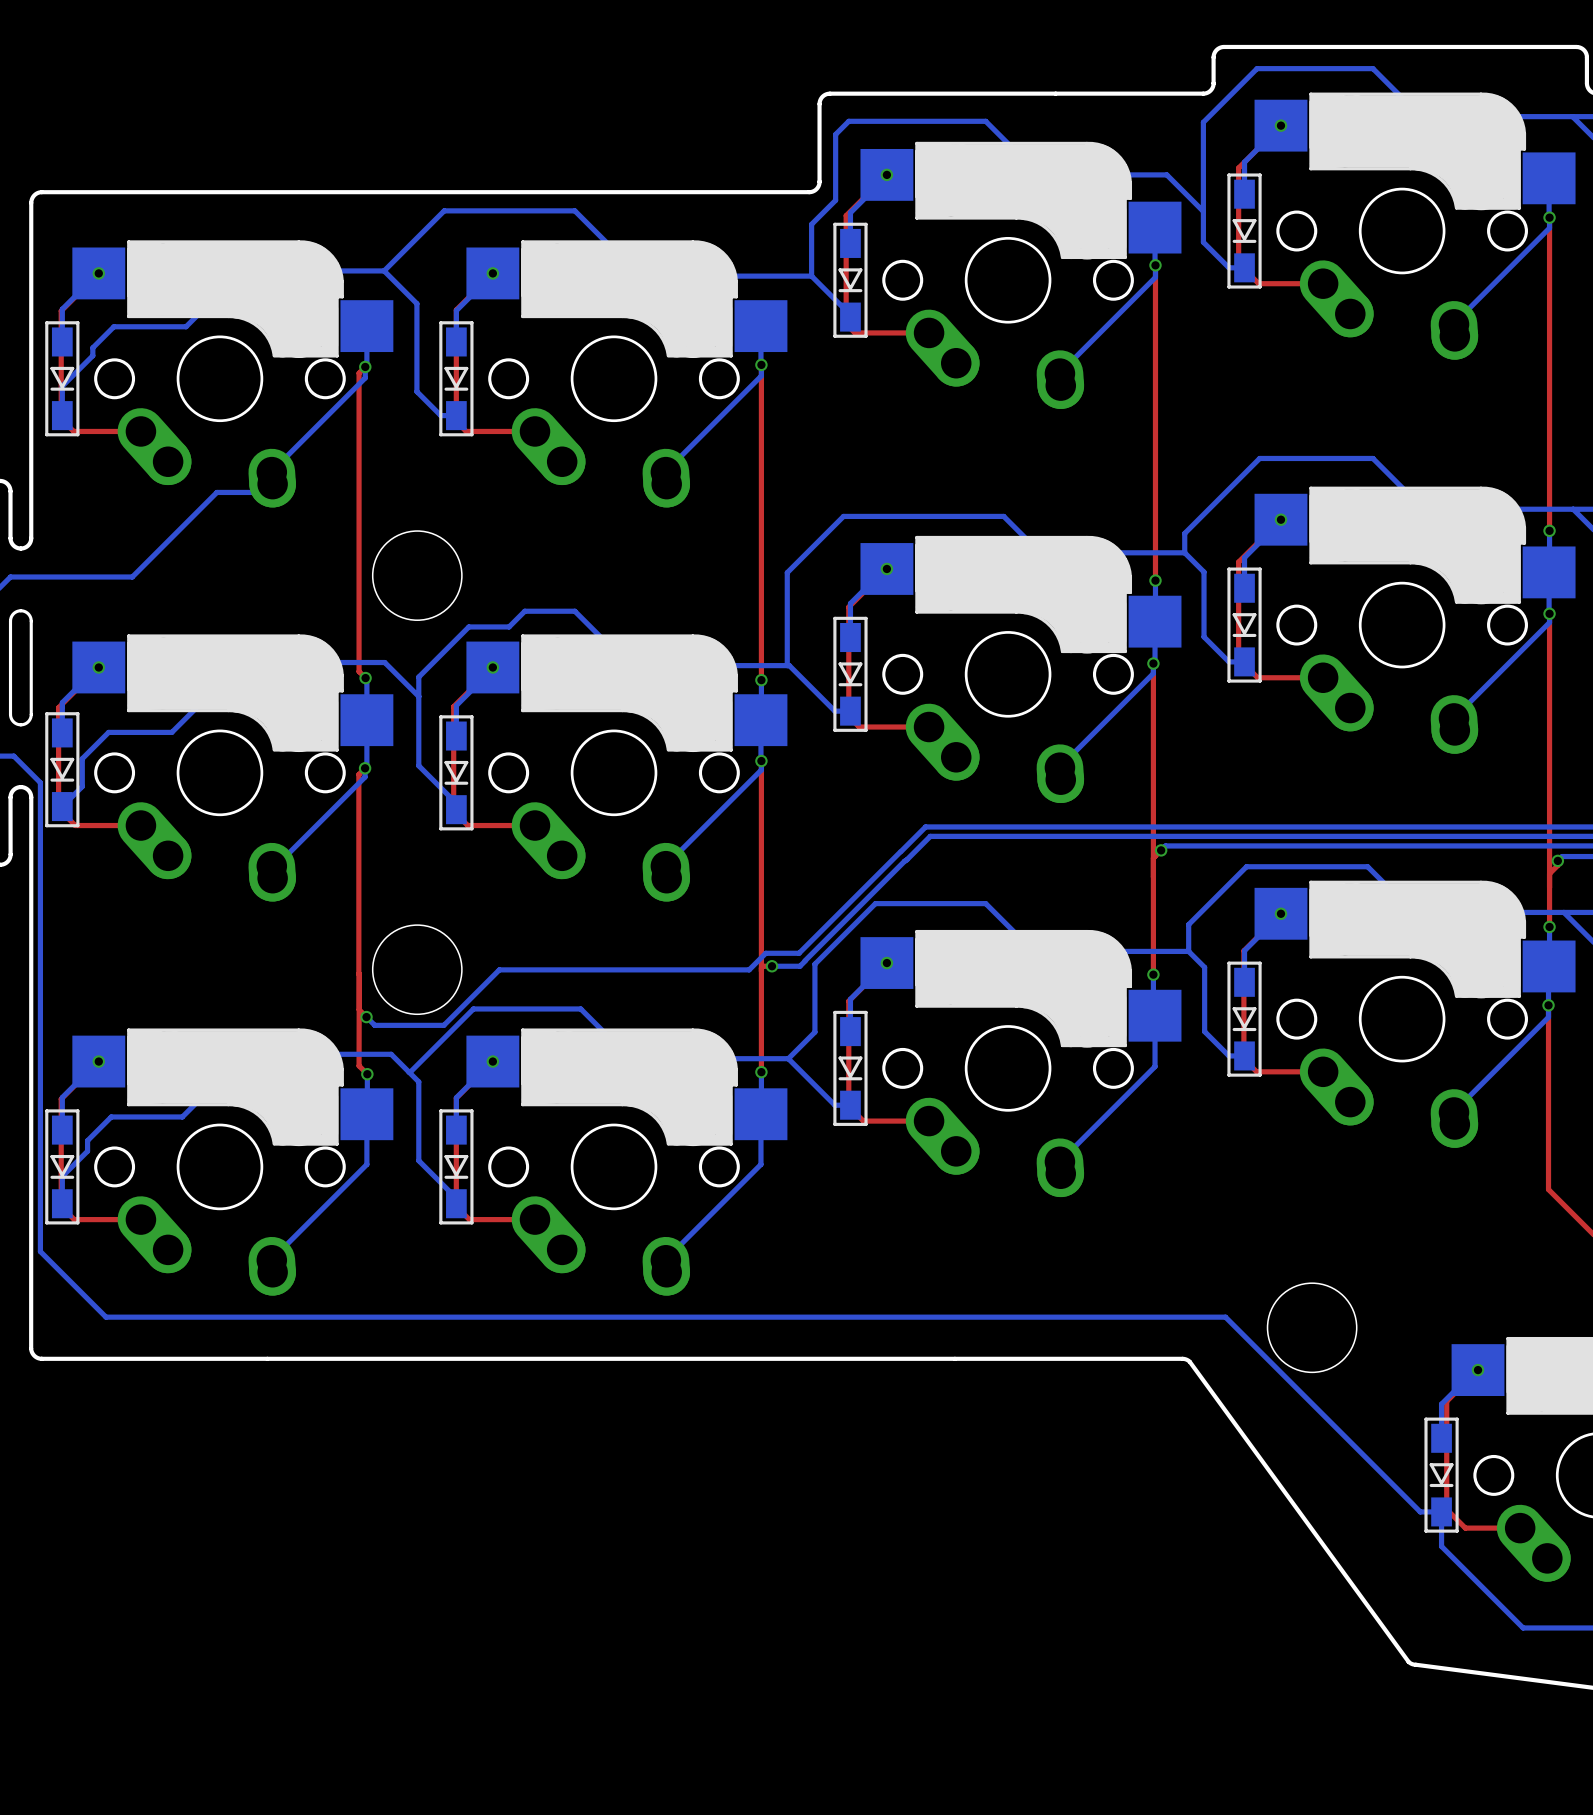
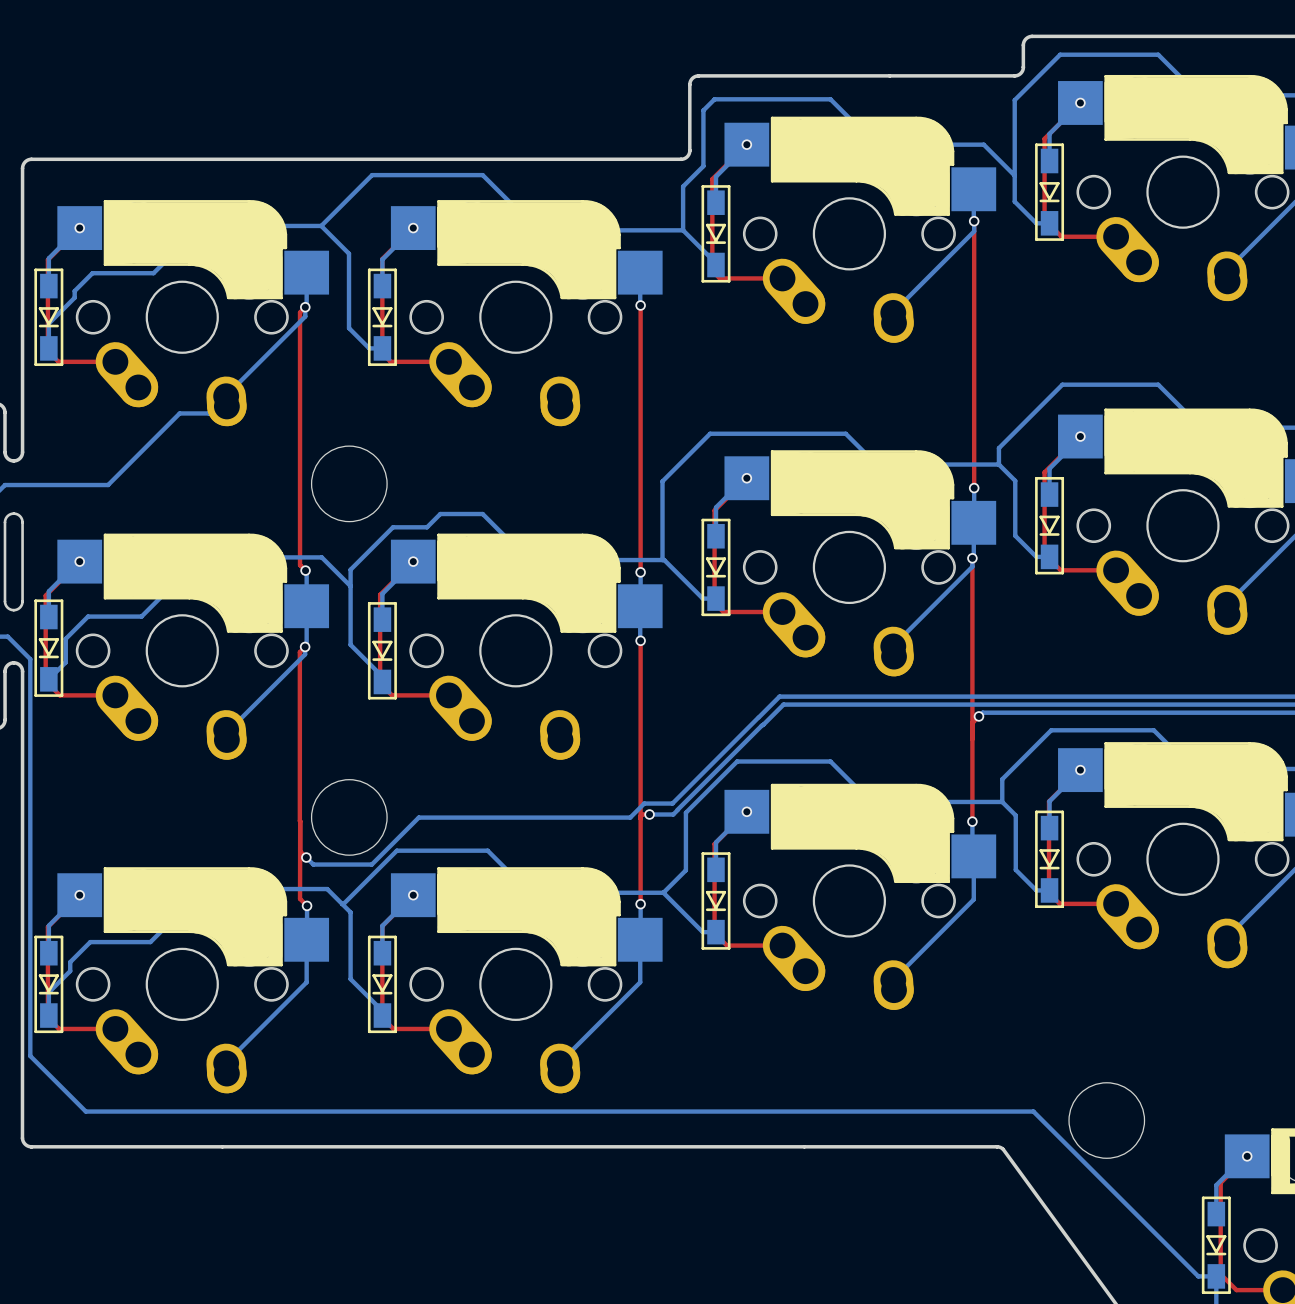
bottom track: (761, 364) (761, 375) (665, 472) -> none
bottom track: (761, 761) (761, 769) (665, 866) -> none

